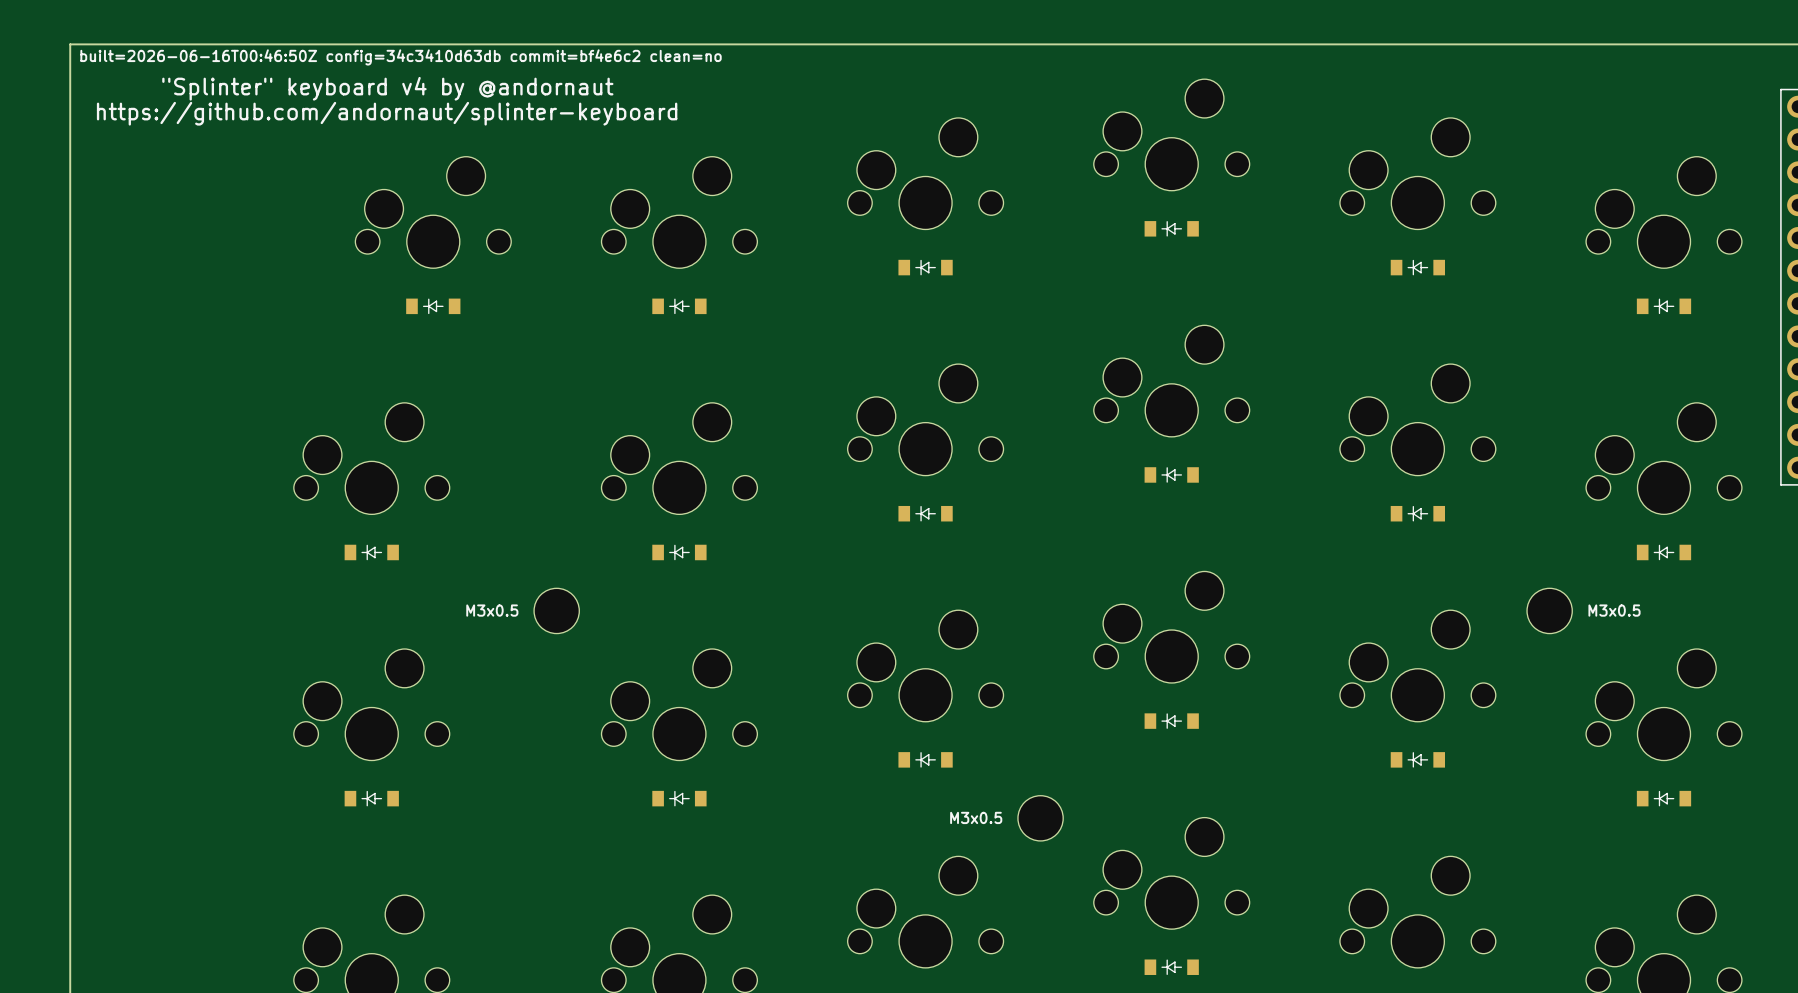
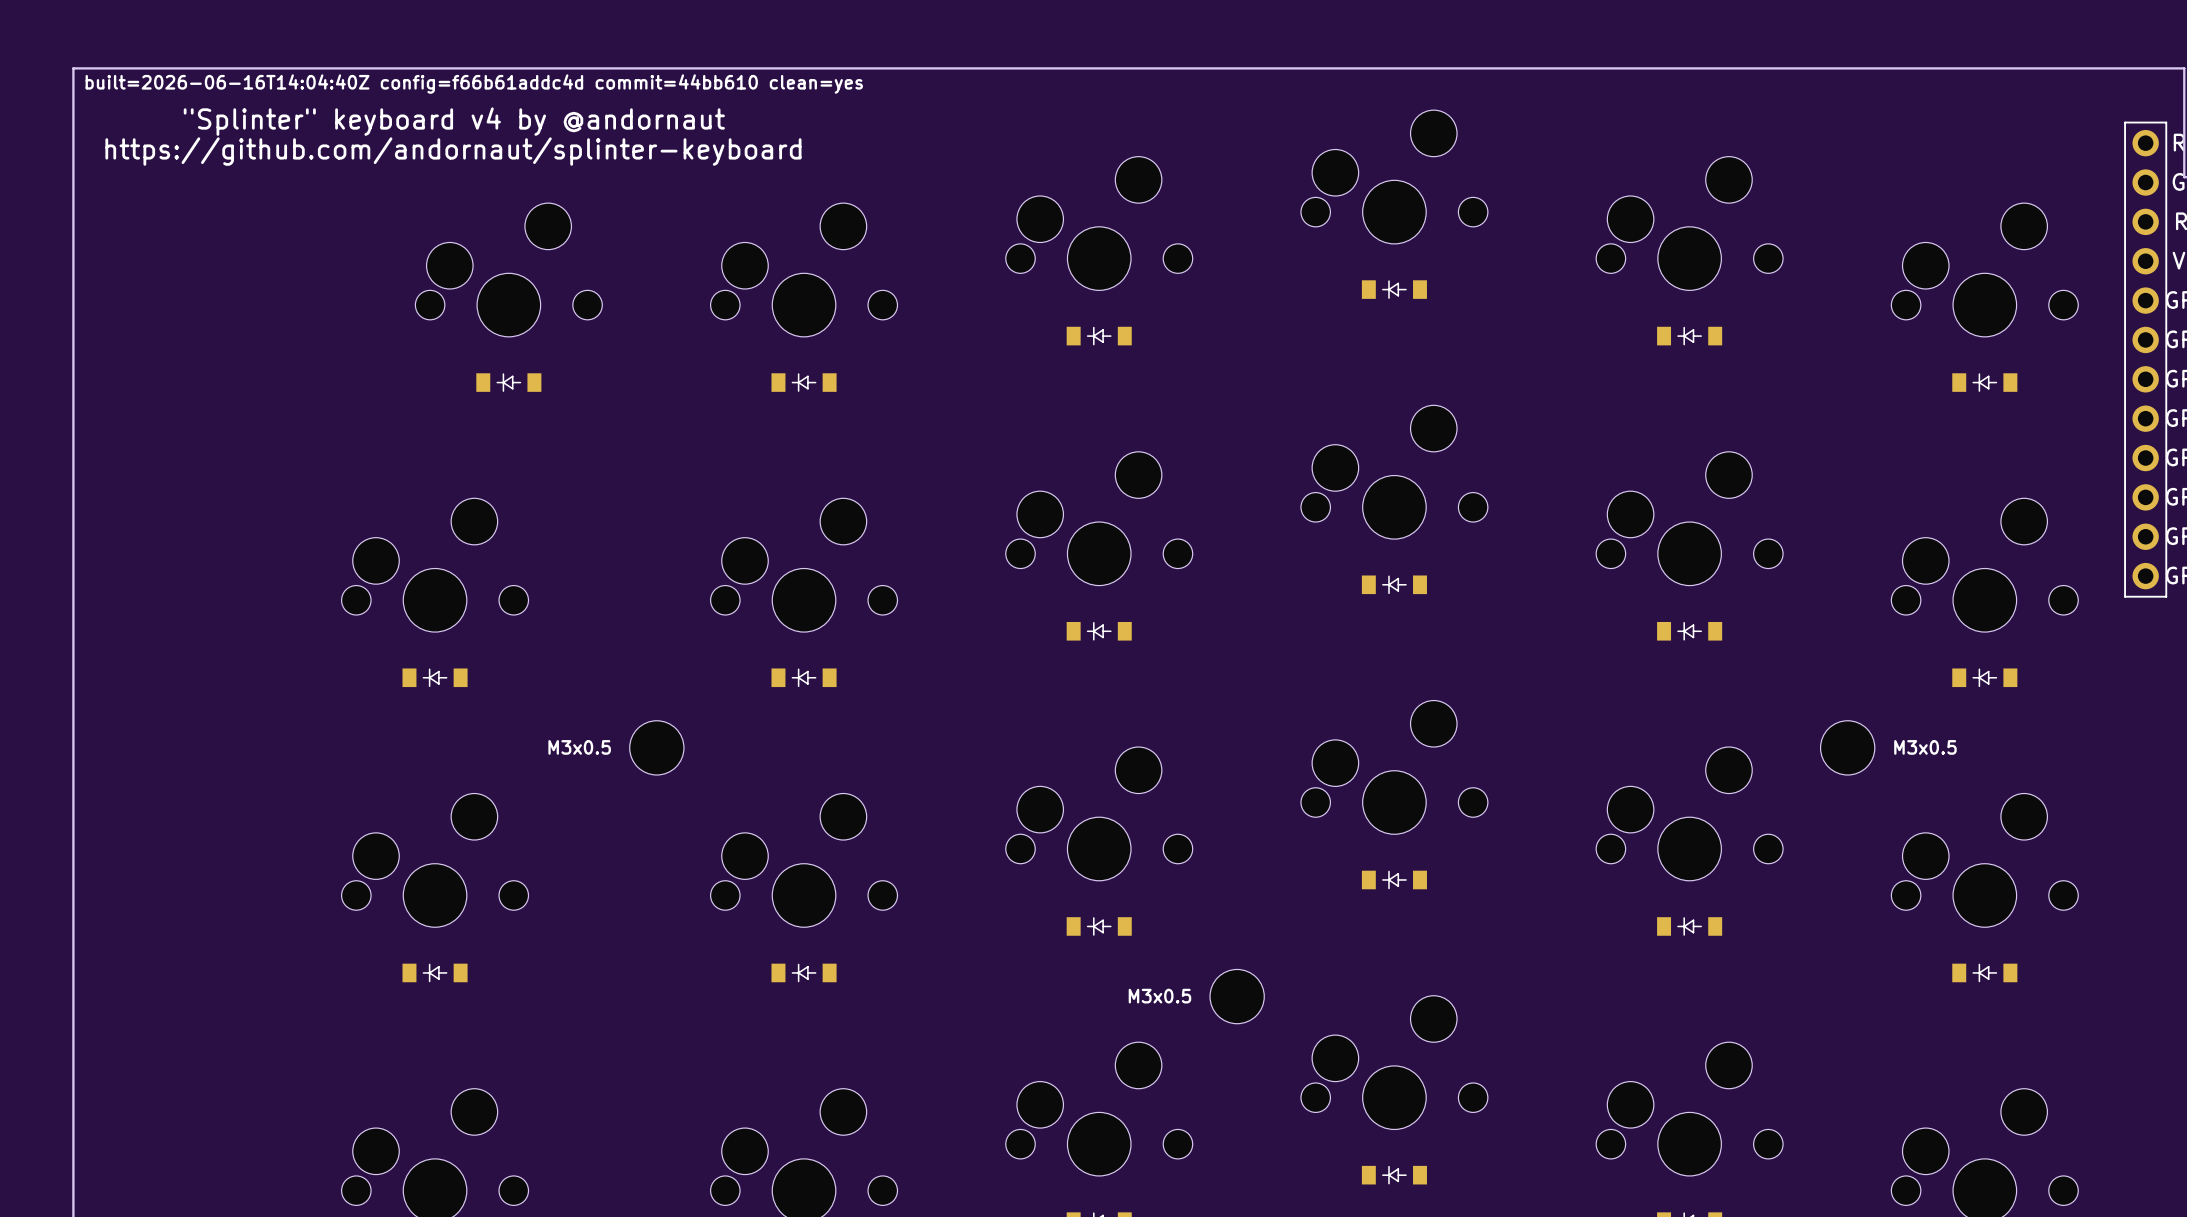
text: built=2026-06-16T00:46:50Z config=34c3410d63db commit=bf4e6c2 clean=no (401, 57) -> built=2026-06-16T14:04:40Z config=f66b61addc4d commit=44bb610 clean=yes (474, 84)

